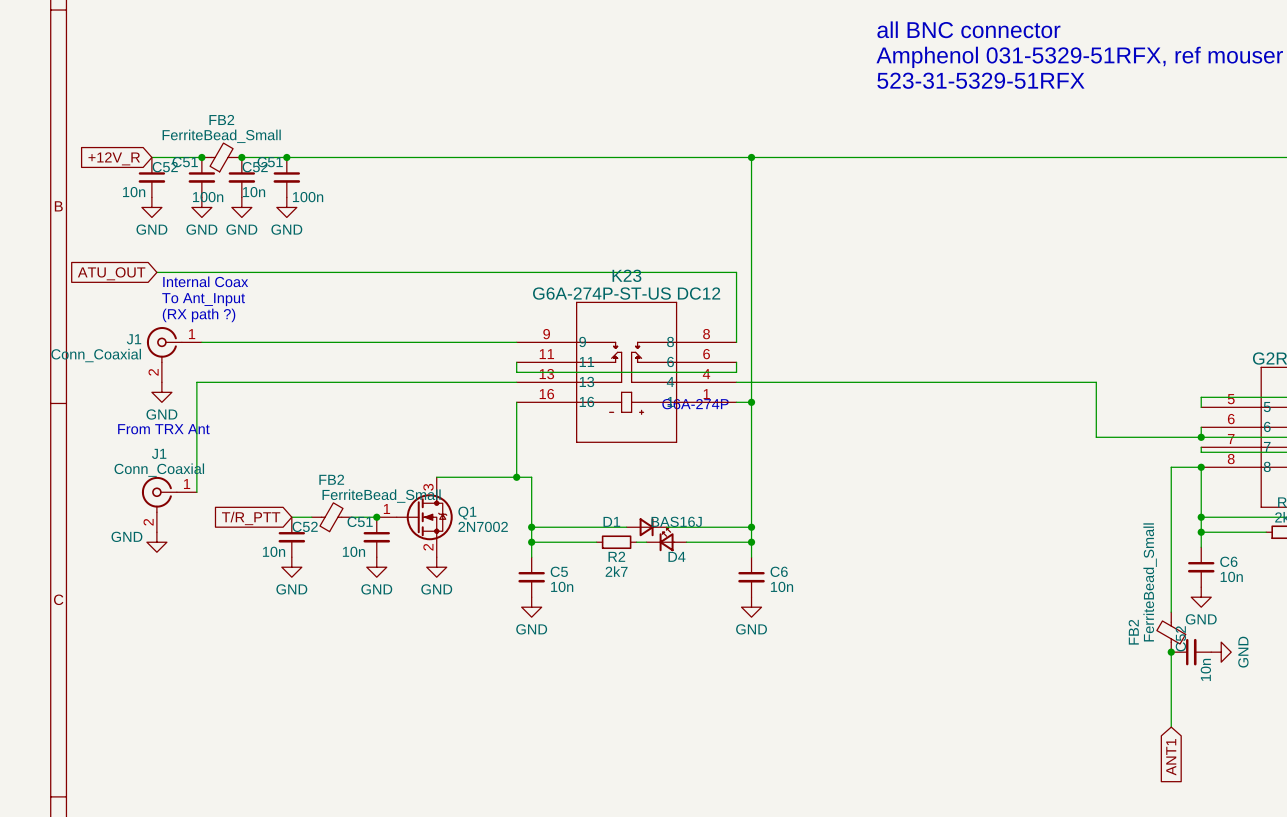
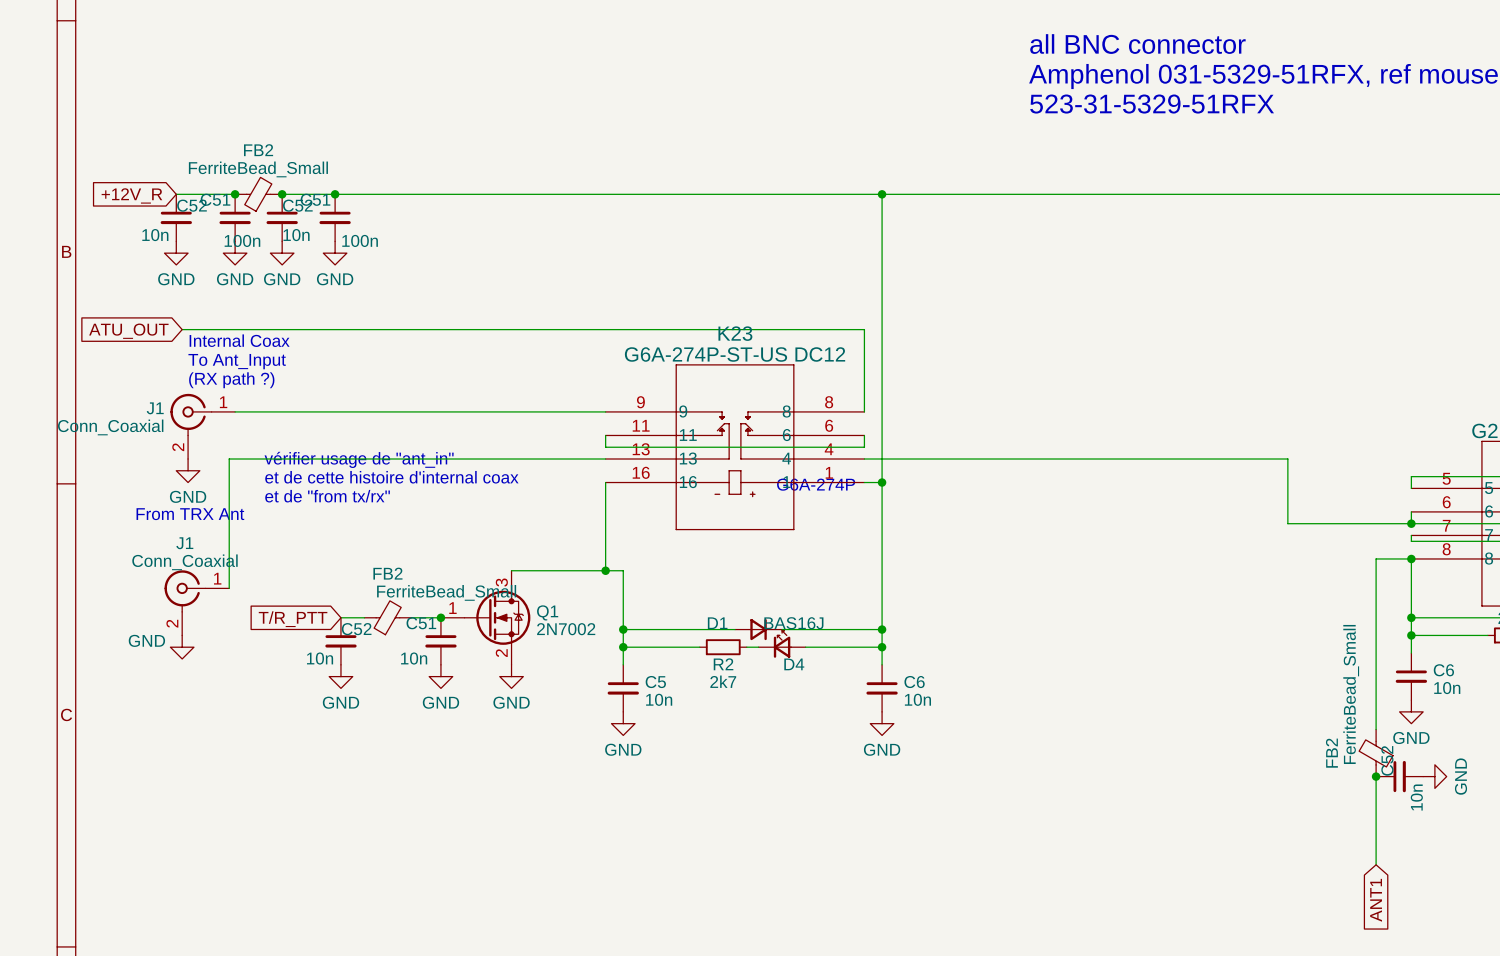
text: none -> vérifier usage de "ant_in" (359, 459)
text: none -> et de cette histoire d'internal coax (391, 477)
text: none -> et de "from tx/rx" (327, 496)

